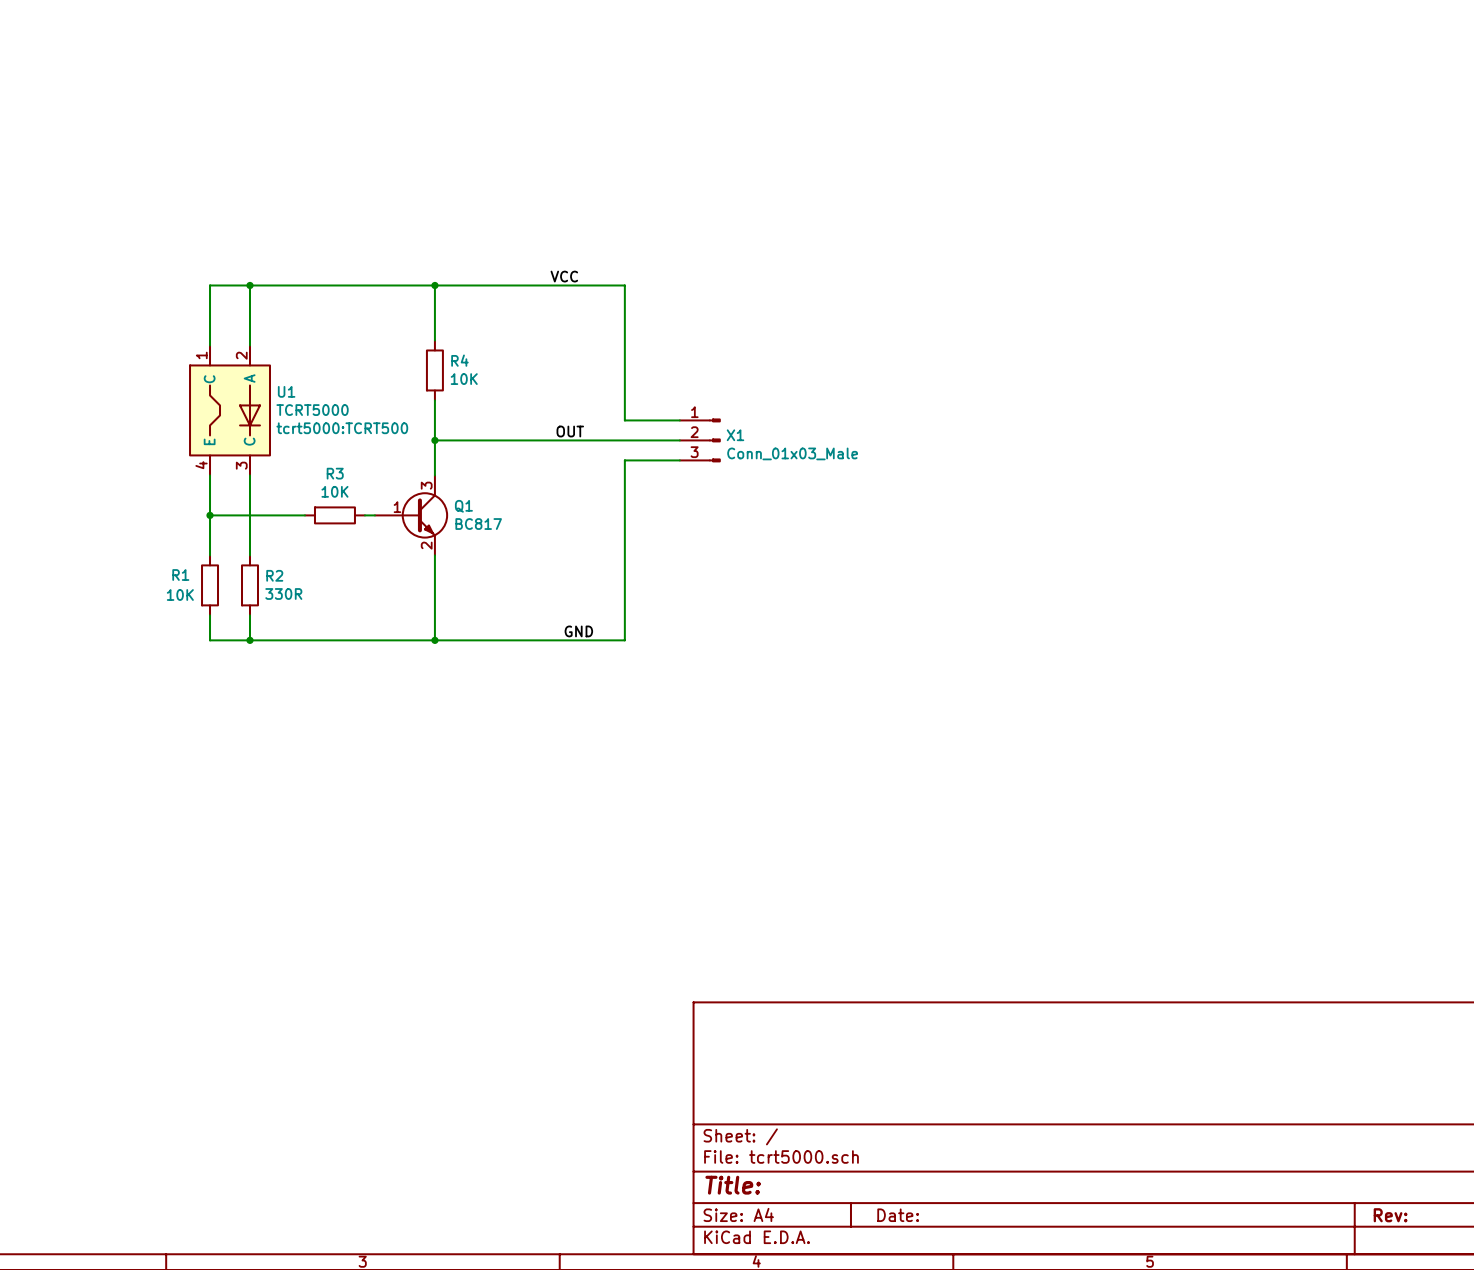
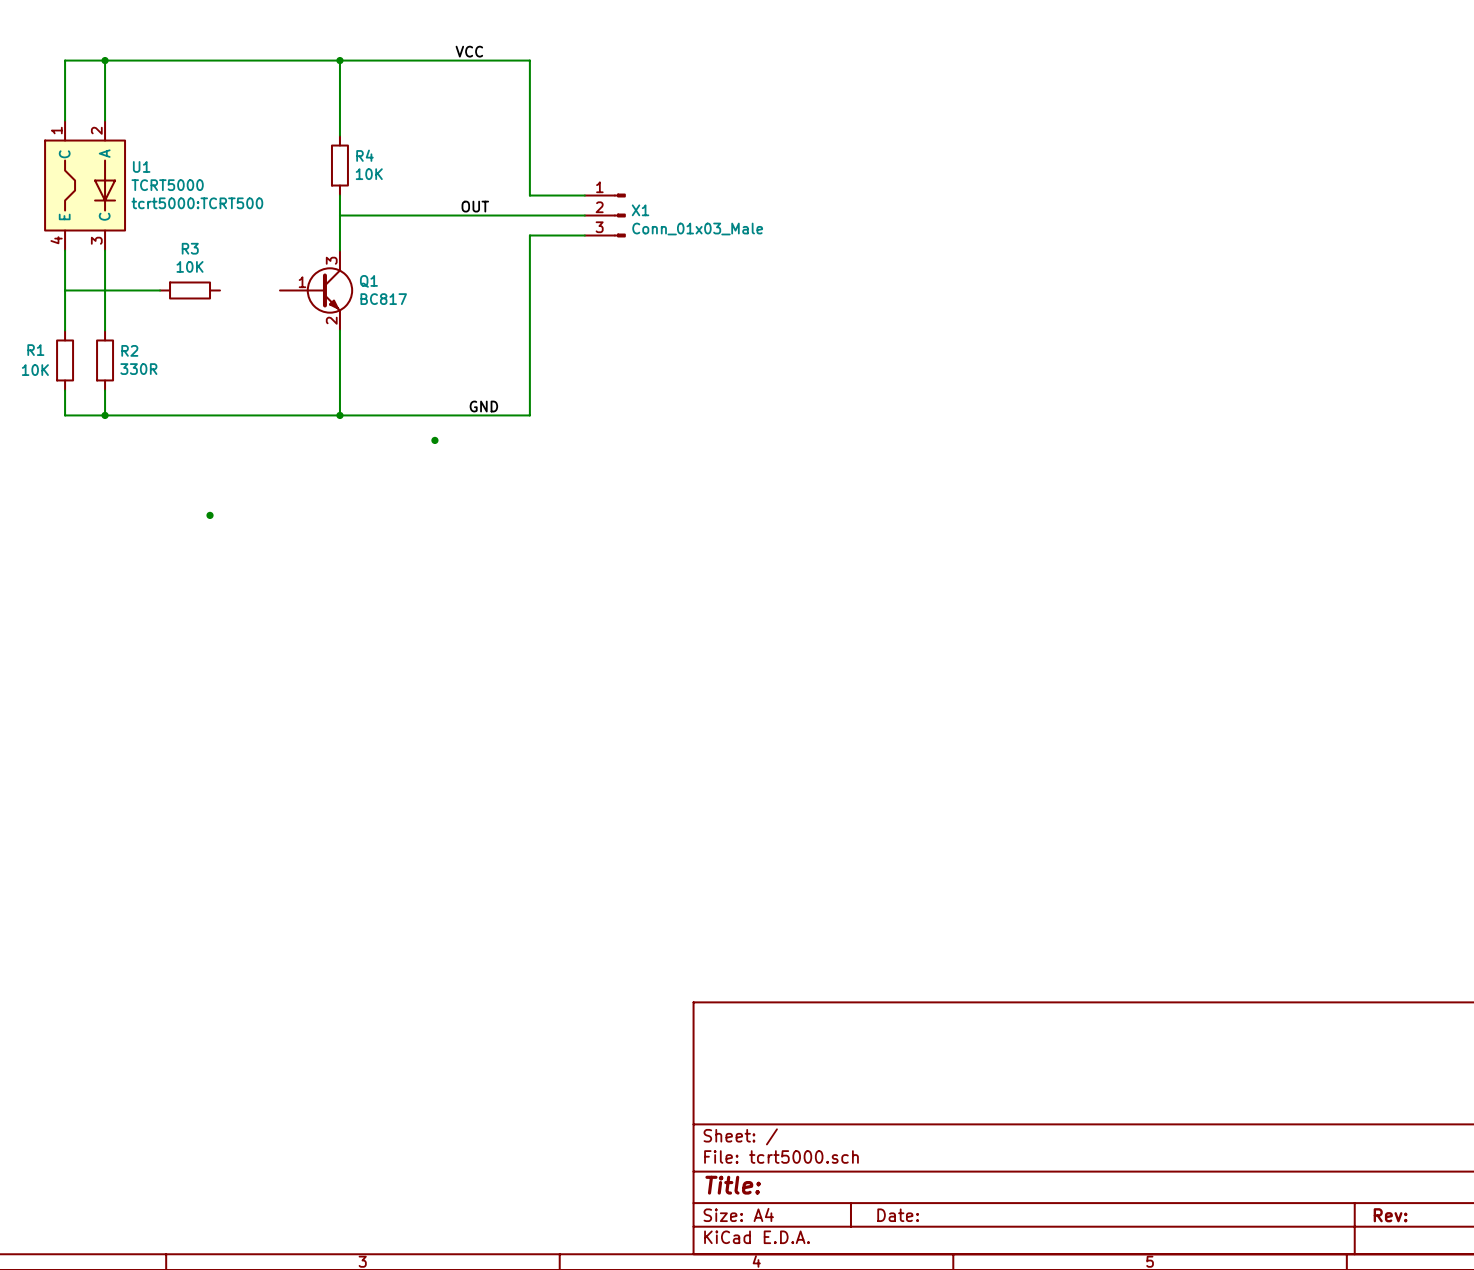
label: none -> VCC (469, 51)
wire: none -> (105, 60) (105, 120)
junction: none -> (105, 60)
wire: none -> (339, 60) (339, 135)
junction: none -> (339, 60)
wire: none -> (65, 120) (65, 60) (529, 60) (529, 195) (584, 195)
label: none -> OUT (475, 206)
wire: none -> (339, 215) (584, 215)
wire: none -> (584, 235) (529, 235) (529, 415) (65, 415) (65, 390)
wire: none -> (65, 250) (65, 330)
wire: none -> (105, 250) (105, 330)
label: VCC (564, 276) -> none
wire: (250, 285) (250, 345) -> none
junction: (250, 285) -> none
wire: (434, 285) (434, 340) -> (339, 195) (339, 250)
junction: (434, 285) -> none
wire: none -> (65, 290) (160, 290)
wire: none -> (339, 330) (339, 415)
wire: (210, 345) (210, 285) (624, 285) (624, 420) (679, 420) -> none
R4 position: (434, 370) -> (339, 165)
wire: none -> (105, 390) (105, 415)
wire: (434, 400) (434, 475) -> none
label: none -> GND (483, 406)
U1 position: (230, 410) -> (85, 185)
junction: none -> (105, 415)
junction: none -> (339, 415)
label: OUT (570, 431) -> none
wire: (434, 440) (679, 440) -> none
X1 position: (700, 440) -> (605, 215)
wire: (679, 460) (624, 460) (624, 640) (210, 640) (210, 615) -> none
wire: (210, 475) (210, 555) -> none
wire: (250, 475) (250, 555) -> none
wire: (210, 515) (304, 515) -> none
R3 position: (334, 515) -> (190, 290)
wire: (364, 515) (374, 515) -> none
Q1 position: (411, 515) -> (316, 290)
wire: (434, 555) (434, 640) -> none
R1 position: (210, 585) -> (65, 360)
R2 position: (250, 585) -> (105, 360)
wire: (250, 615) (250, 640) -> none
label: GND (578, 631) -> none
junction: (250, 640) -> none
junction: (434, 640) -> none

